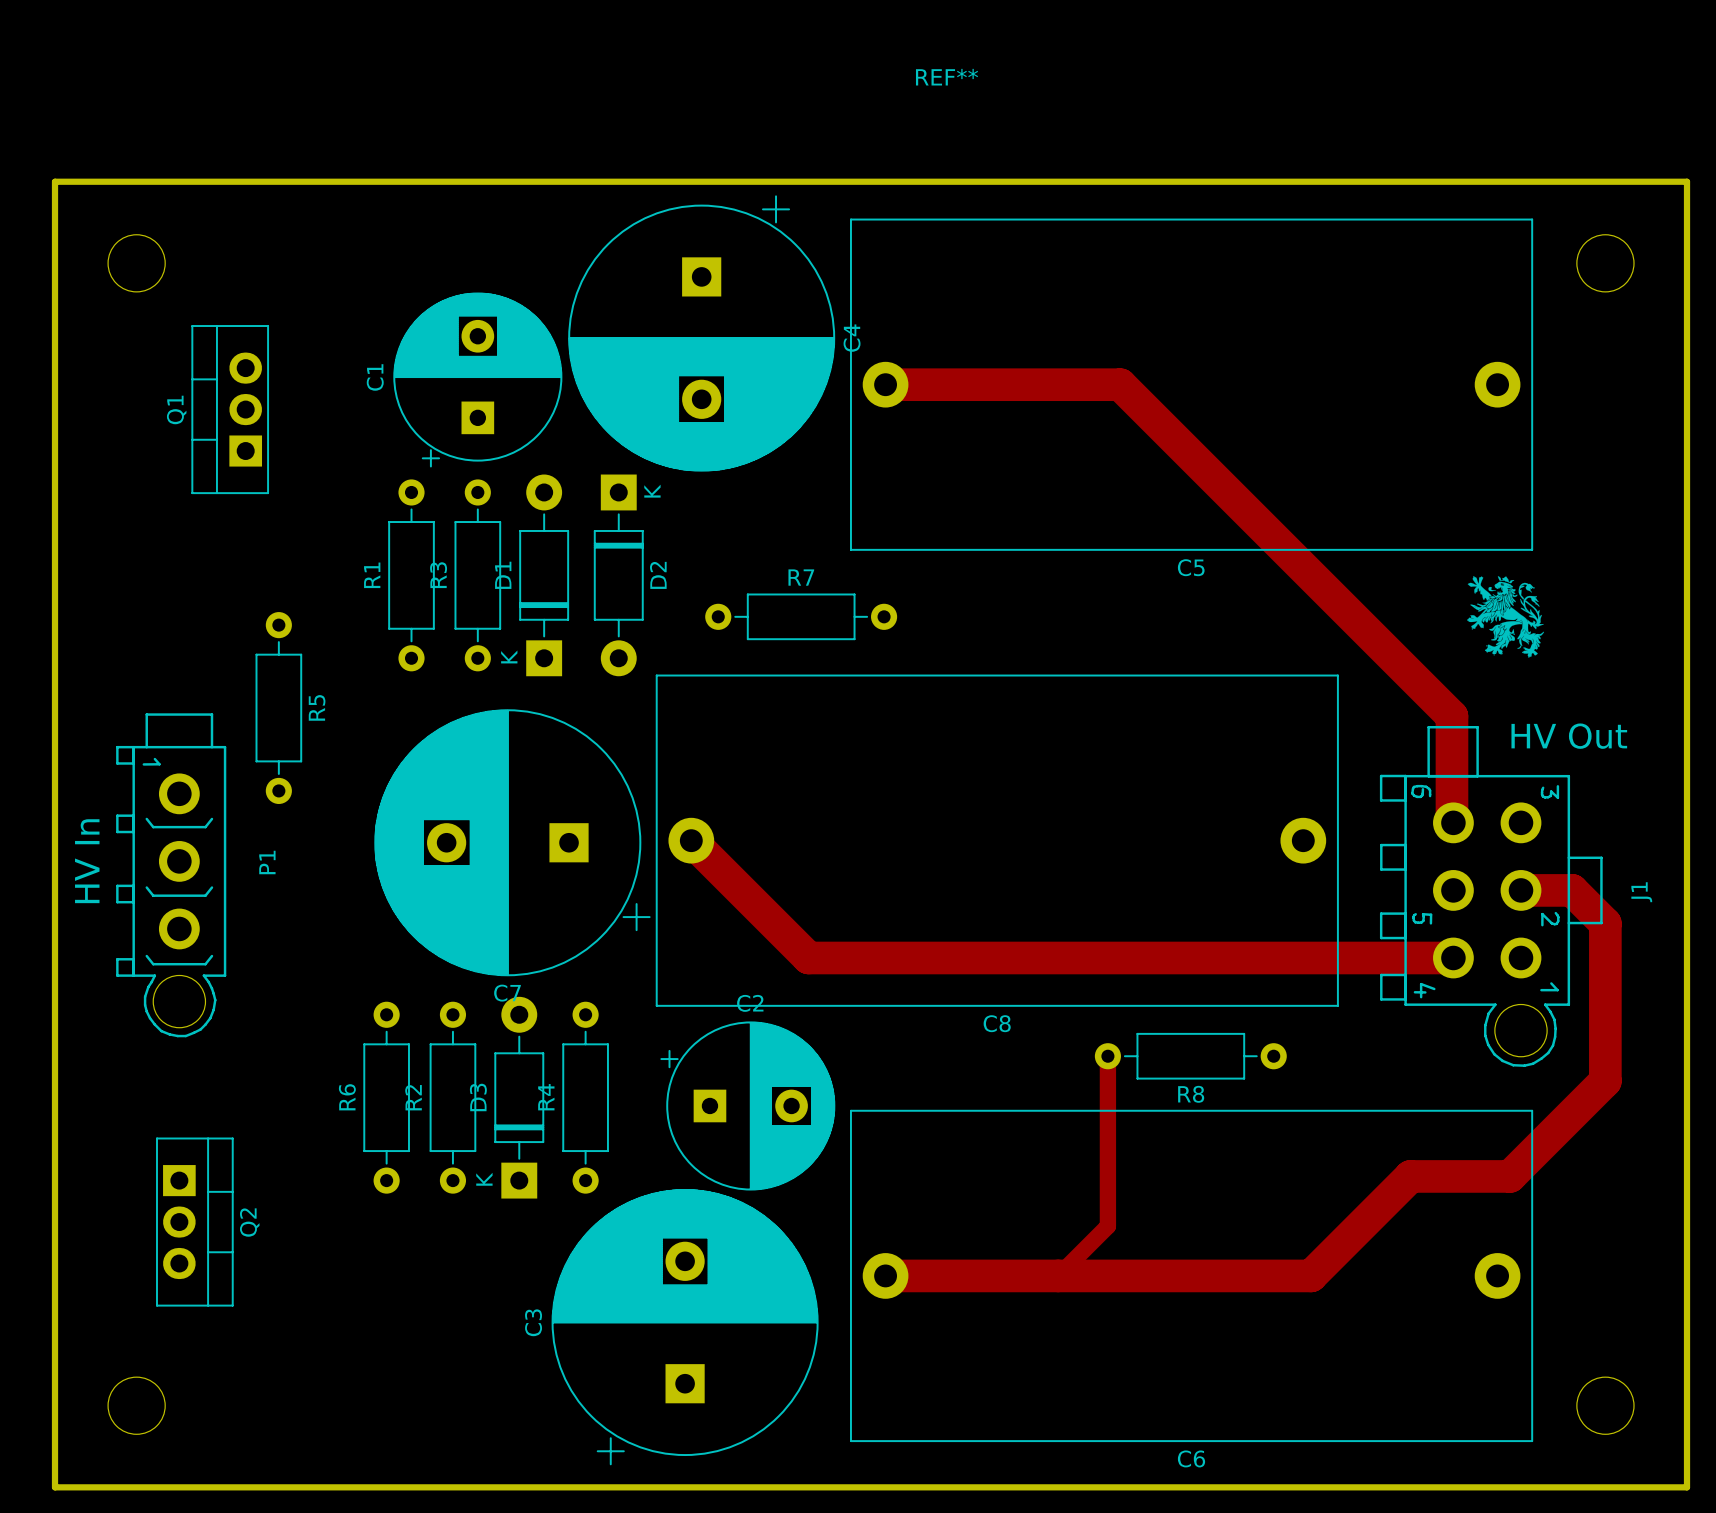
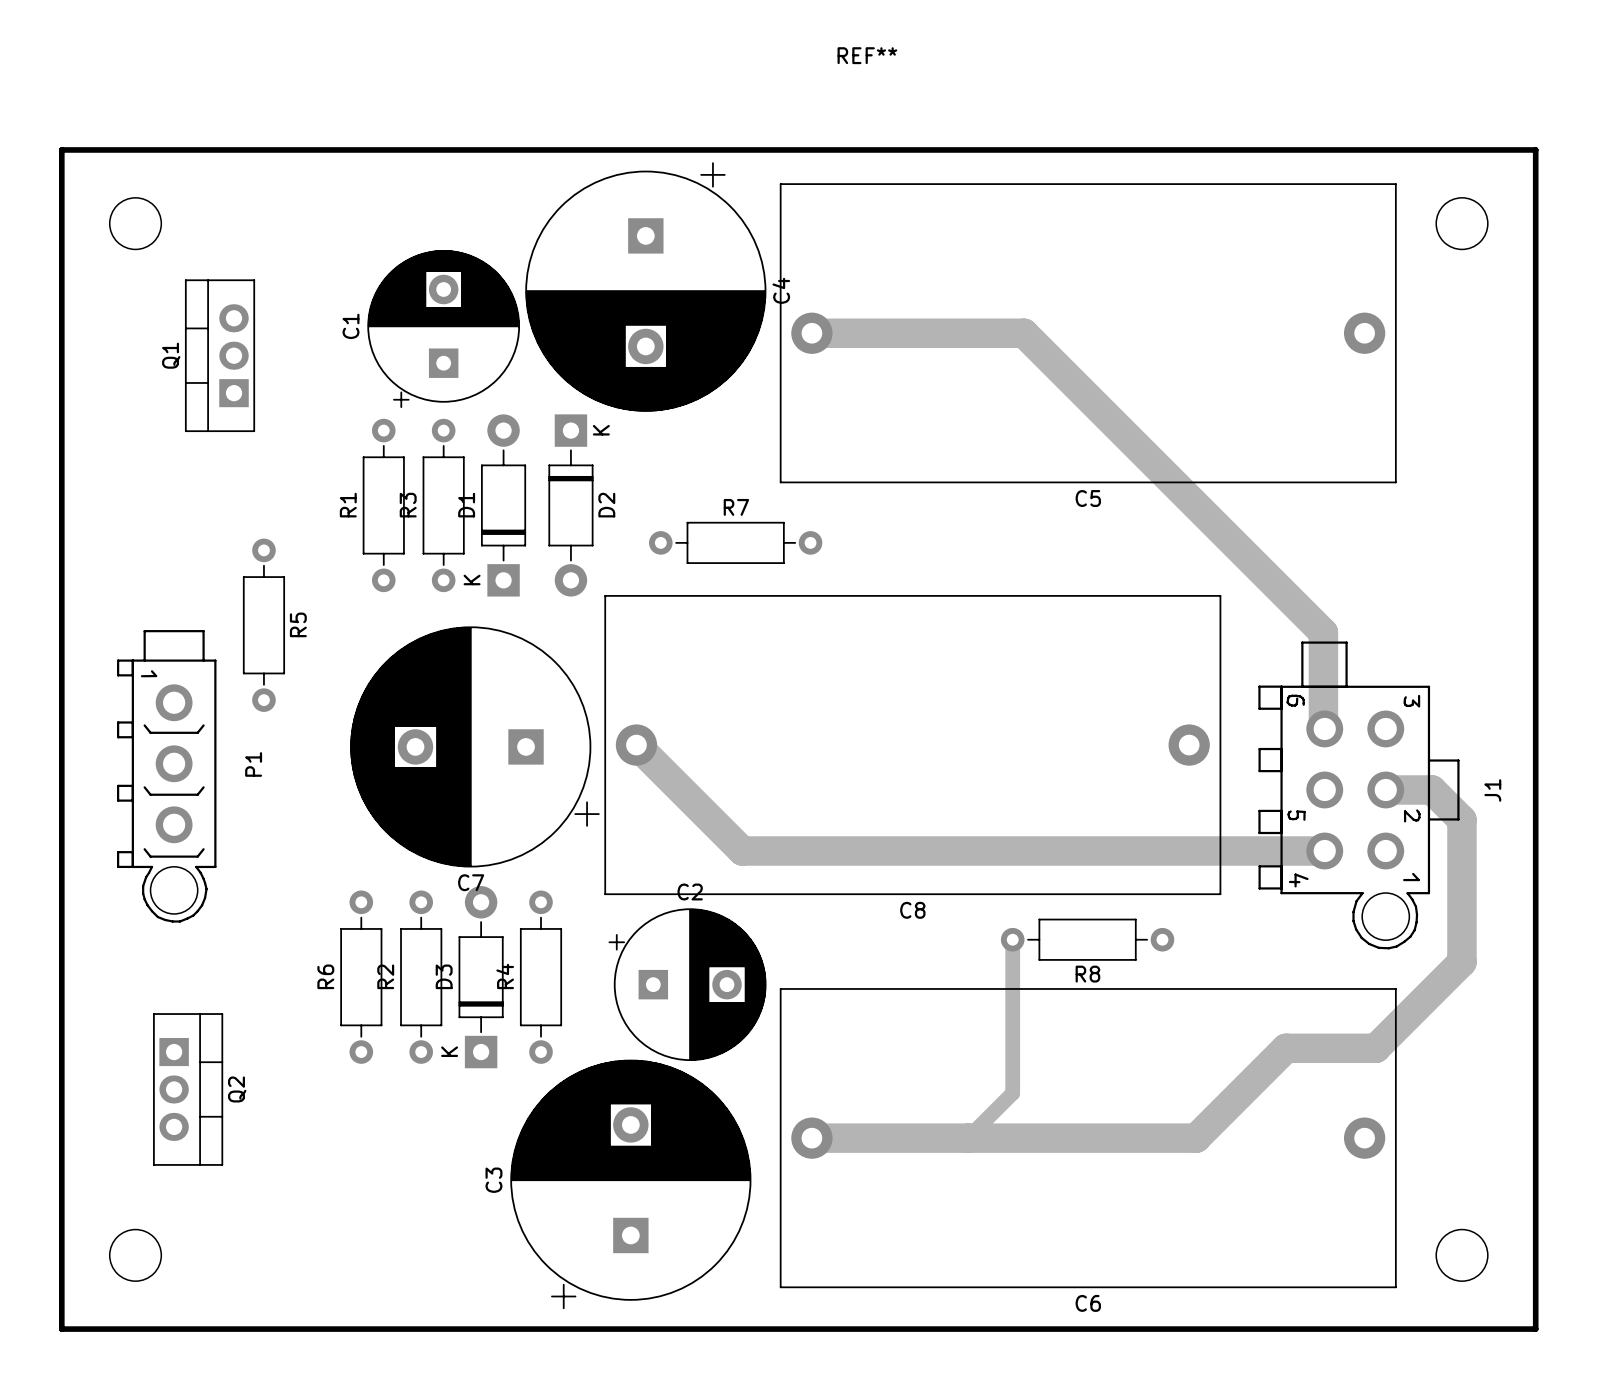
drawing: [1467, 576, 1545, 658] -> none
text: HV Out (1569, 736) -> none
text: HV In (87, 861) -> none

